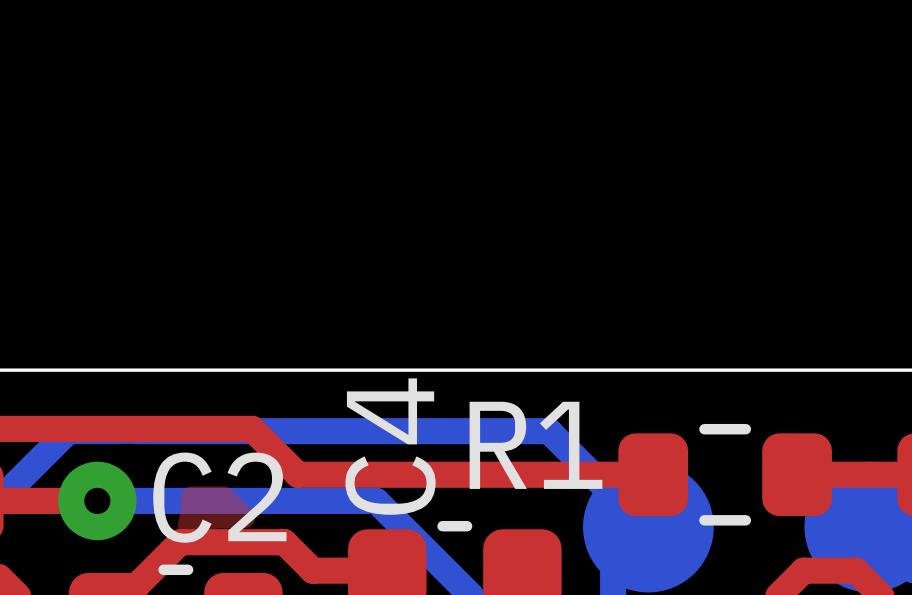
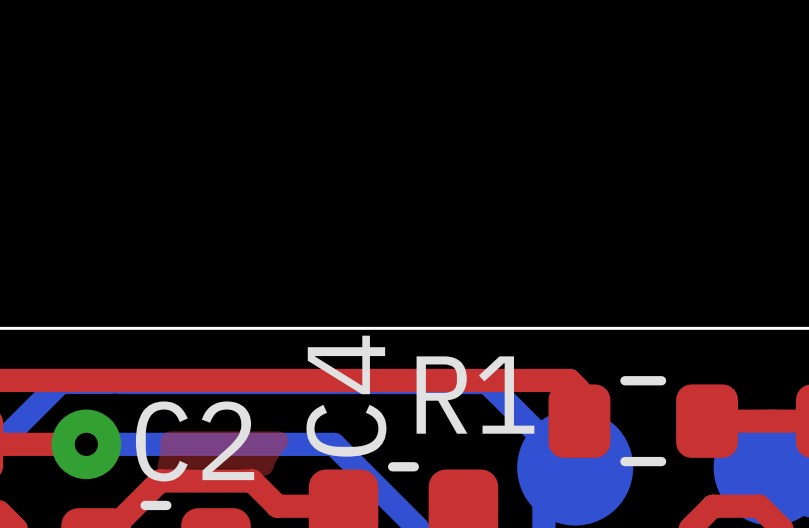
top track: (252, 428) (297, 474) (653, 474) -> (223, 380) (569, 380) (579, 390)

